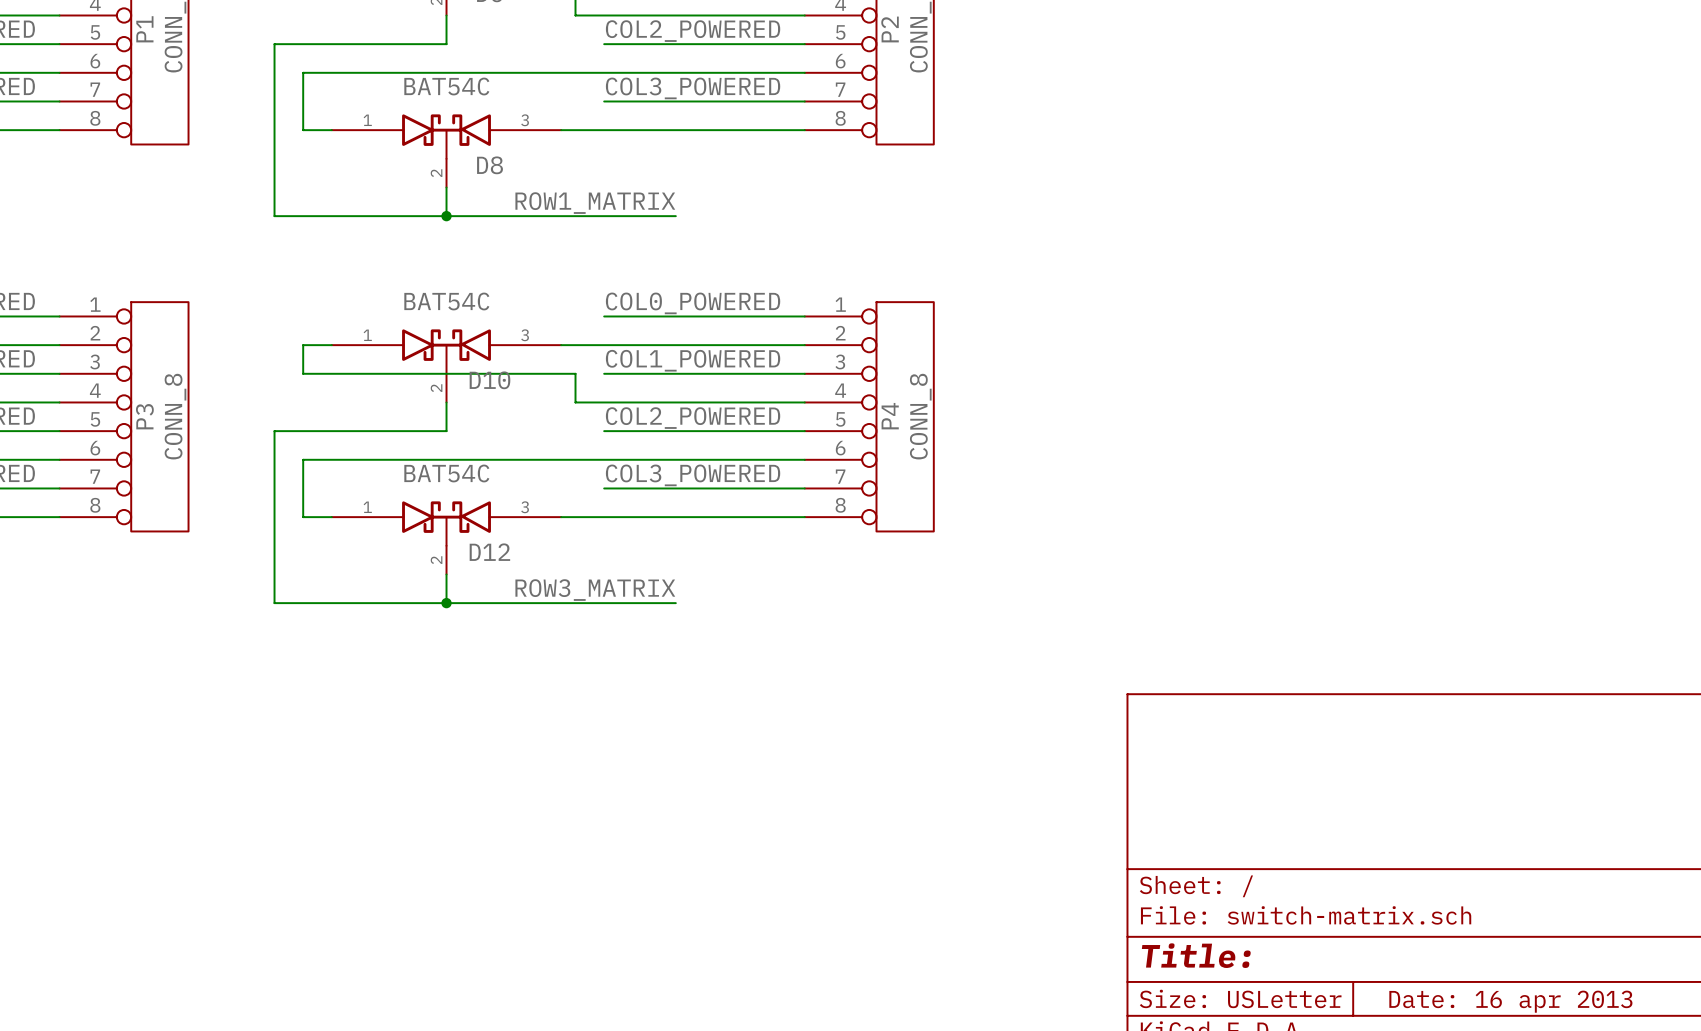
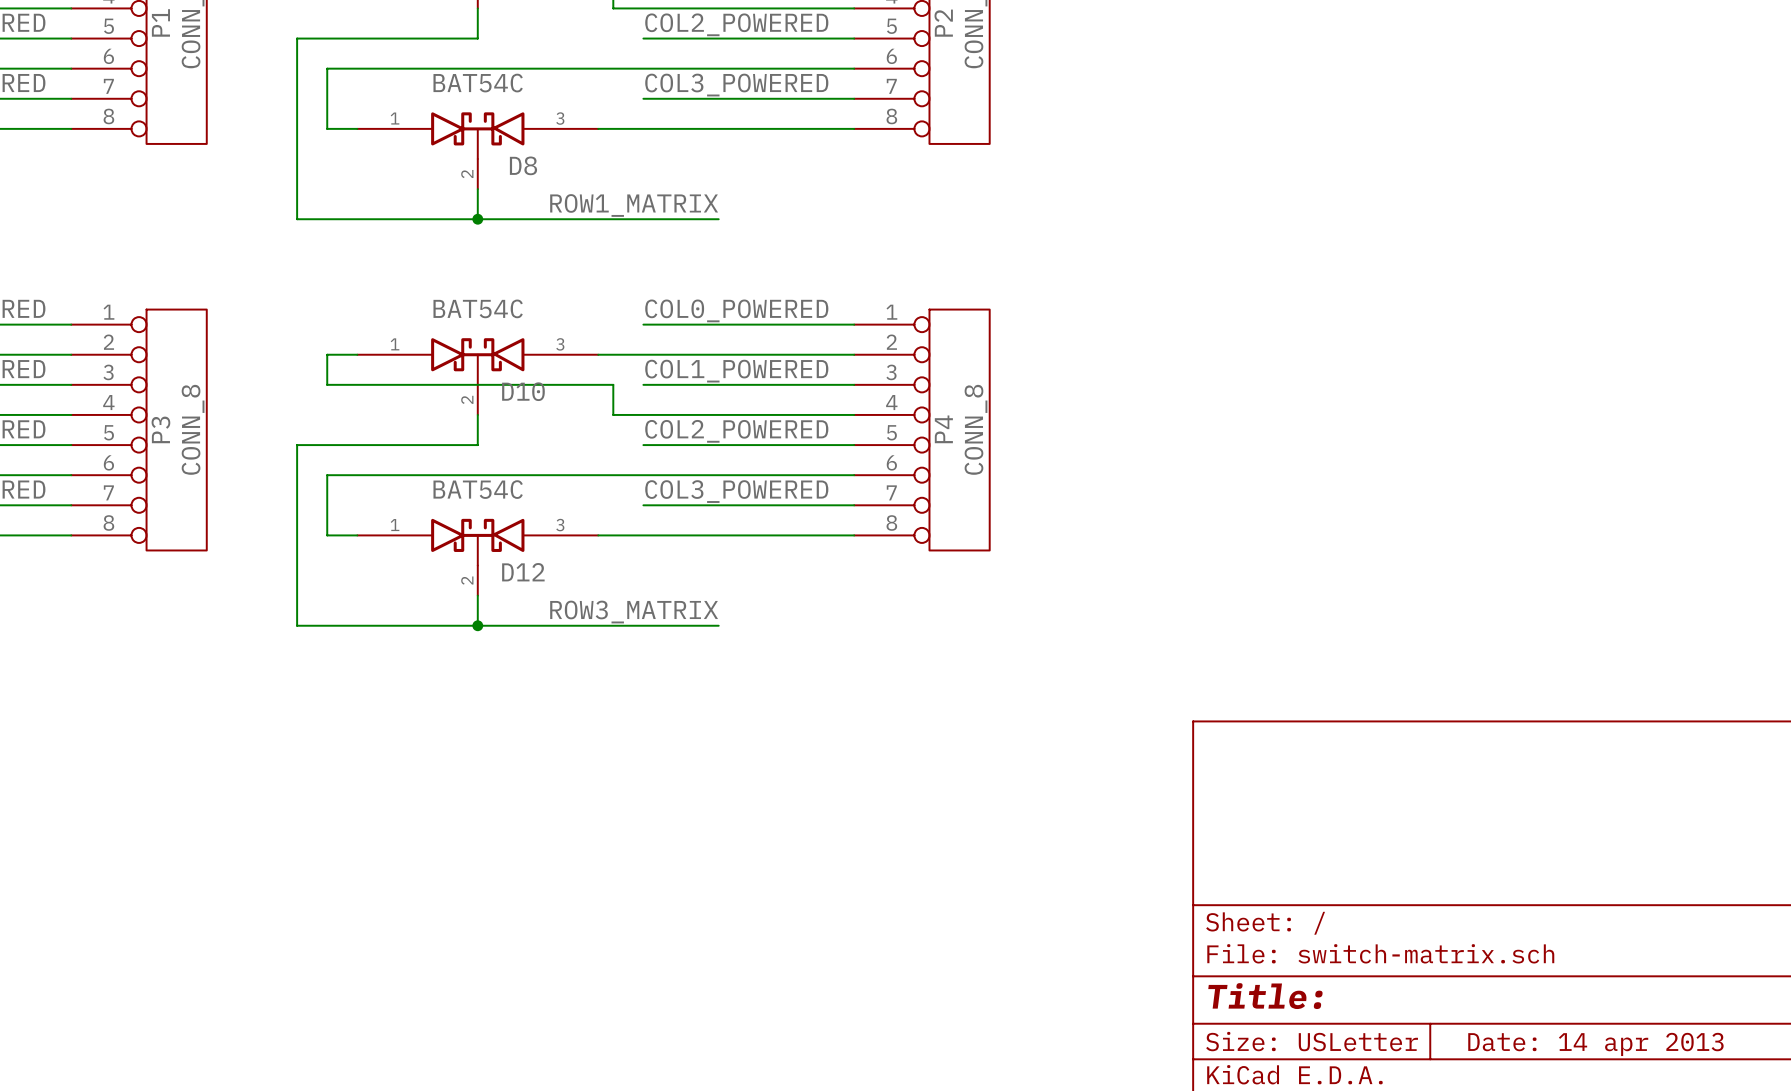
title block: Date: 16 apr 2013 (1510, 1001) -> Date: 14 apr 2013 (1595, 1044)

